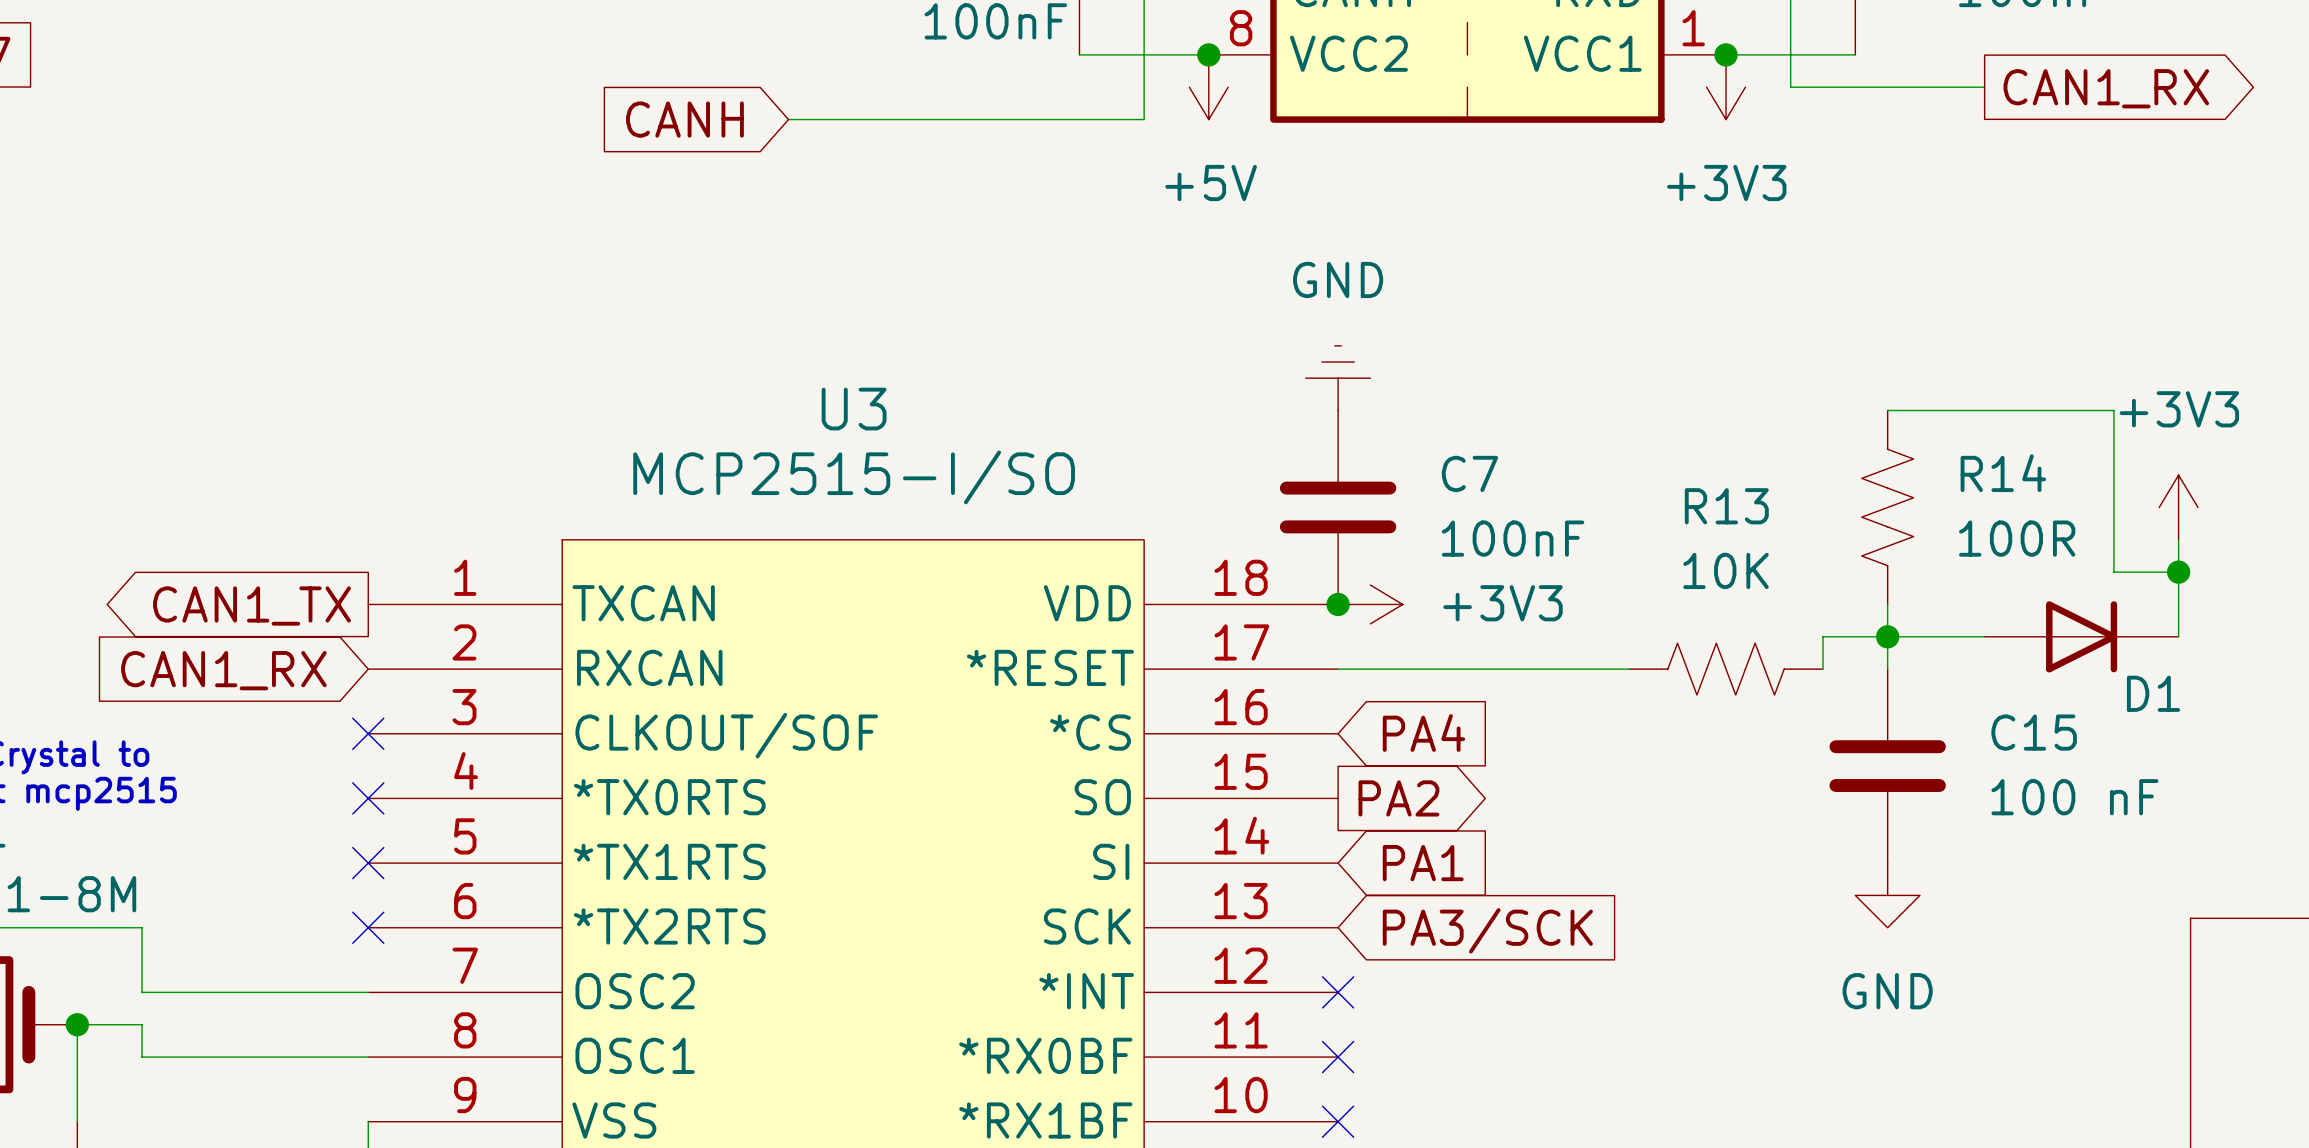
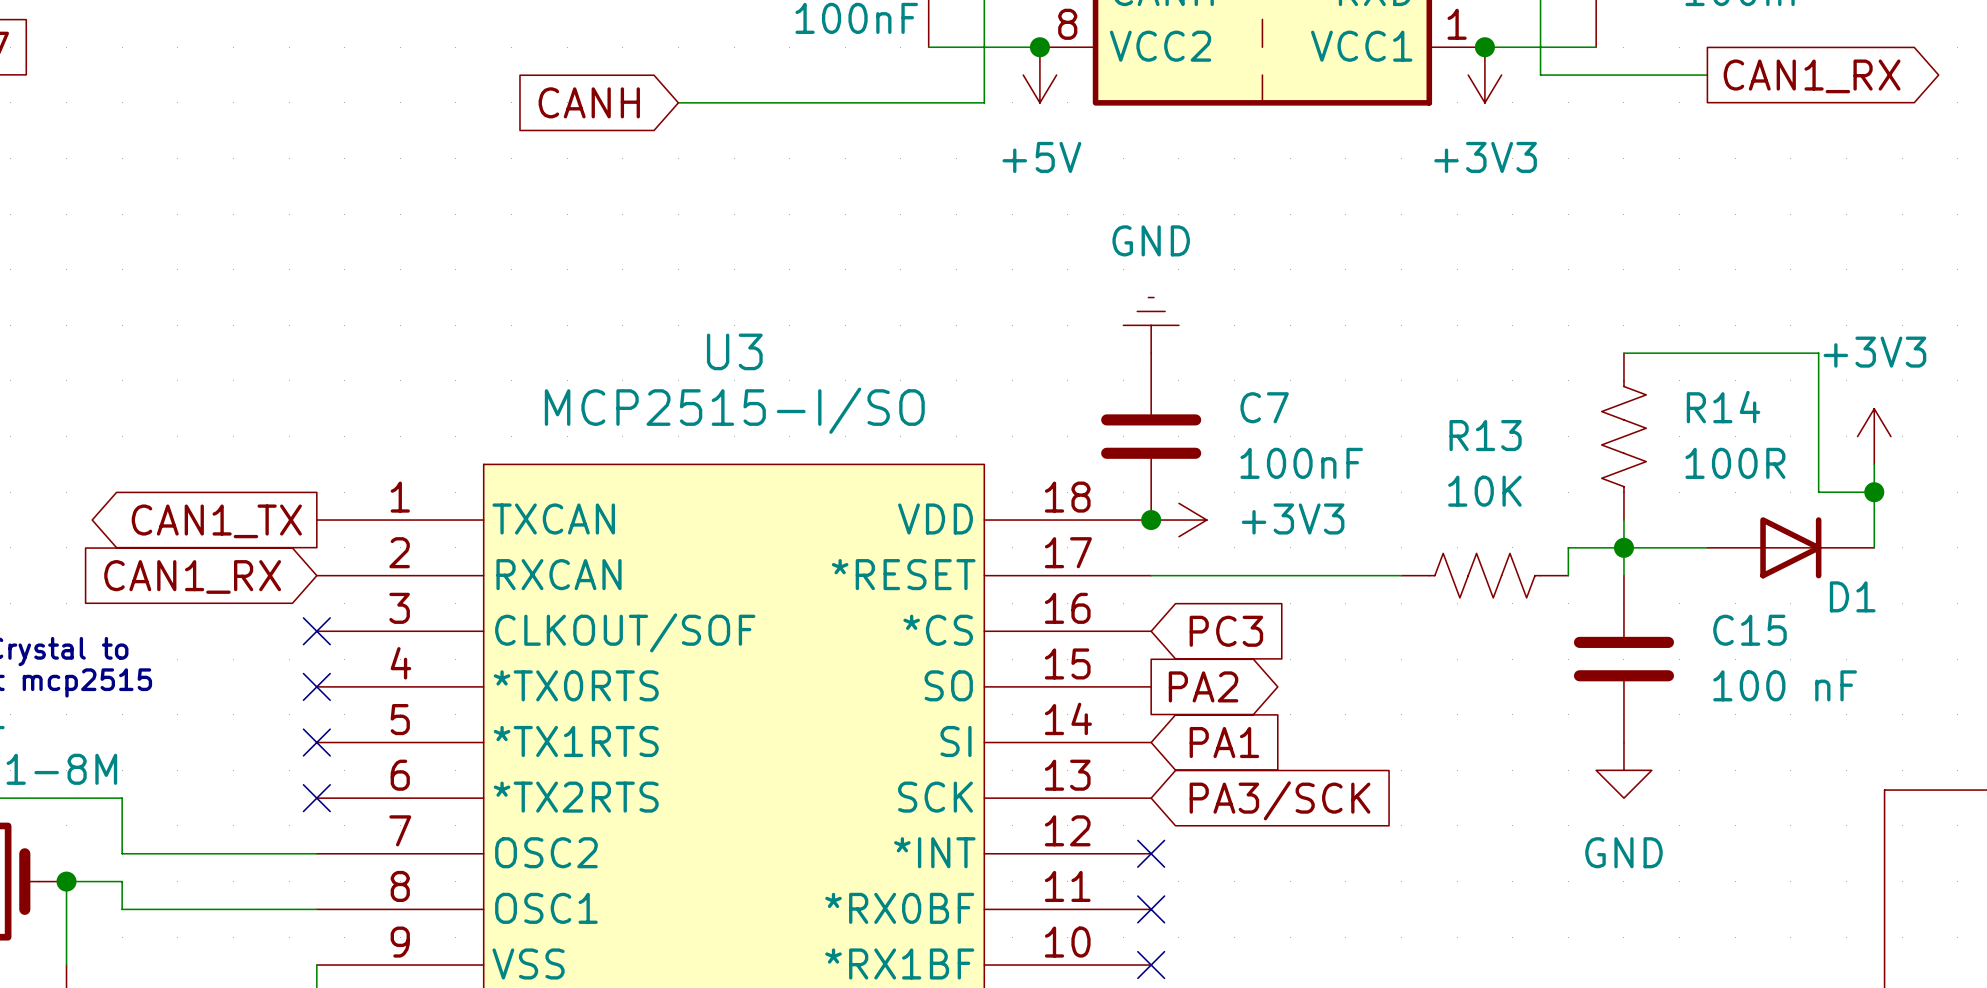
global label: PA4 (1423, 733) -> PC3 (1226, 631)

